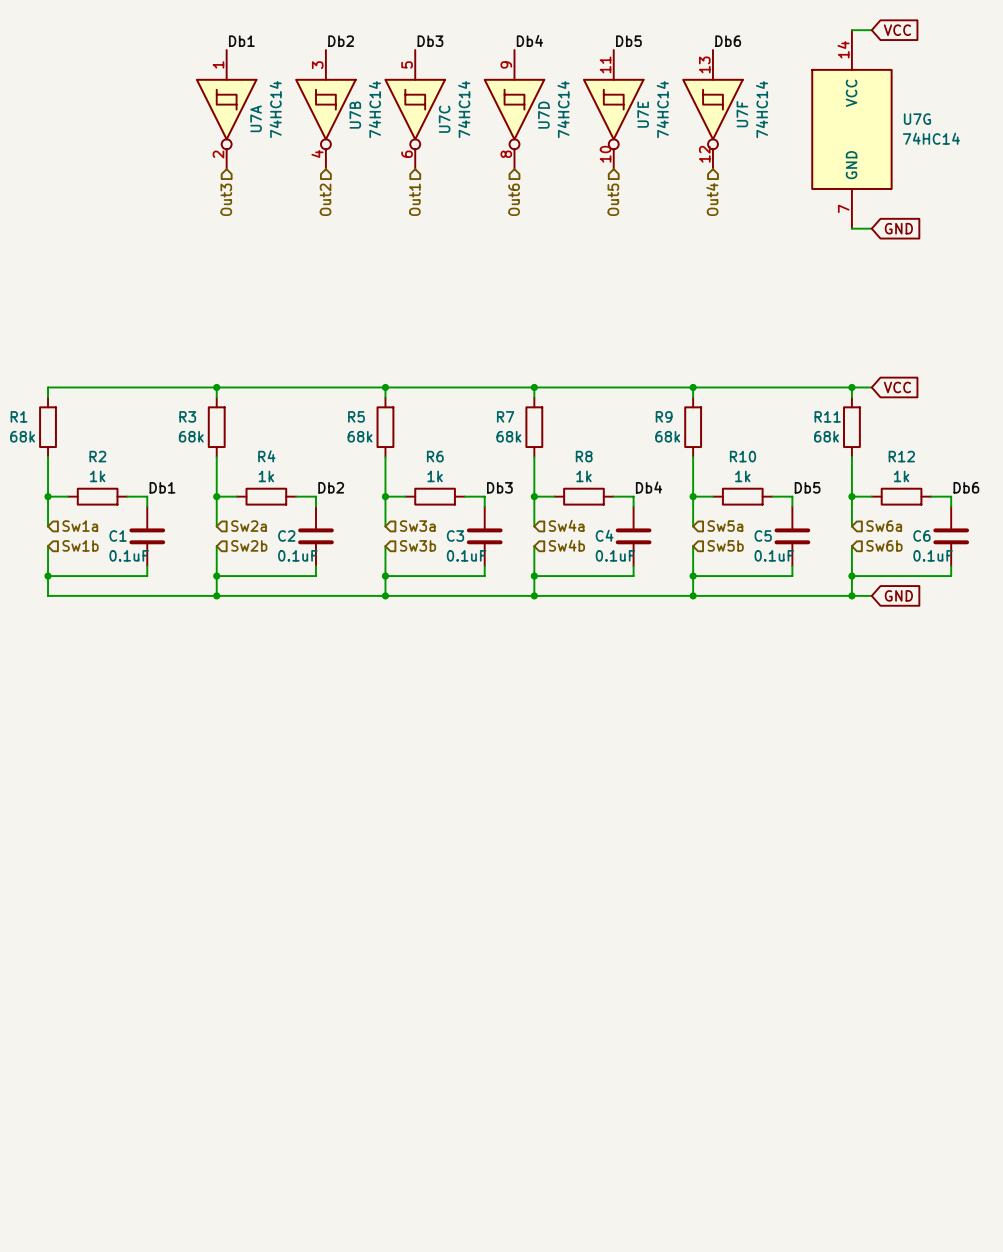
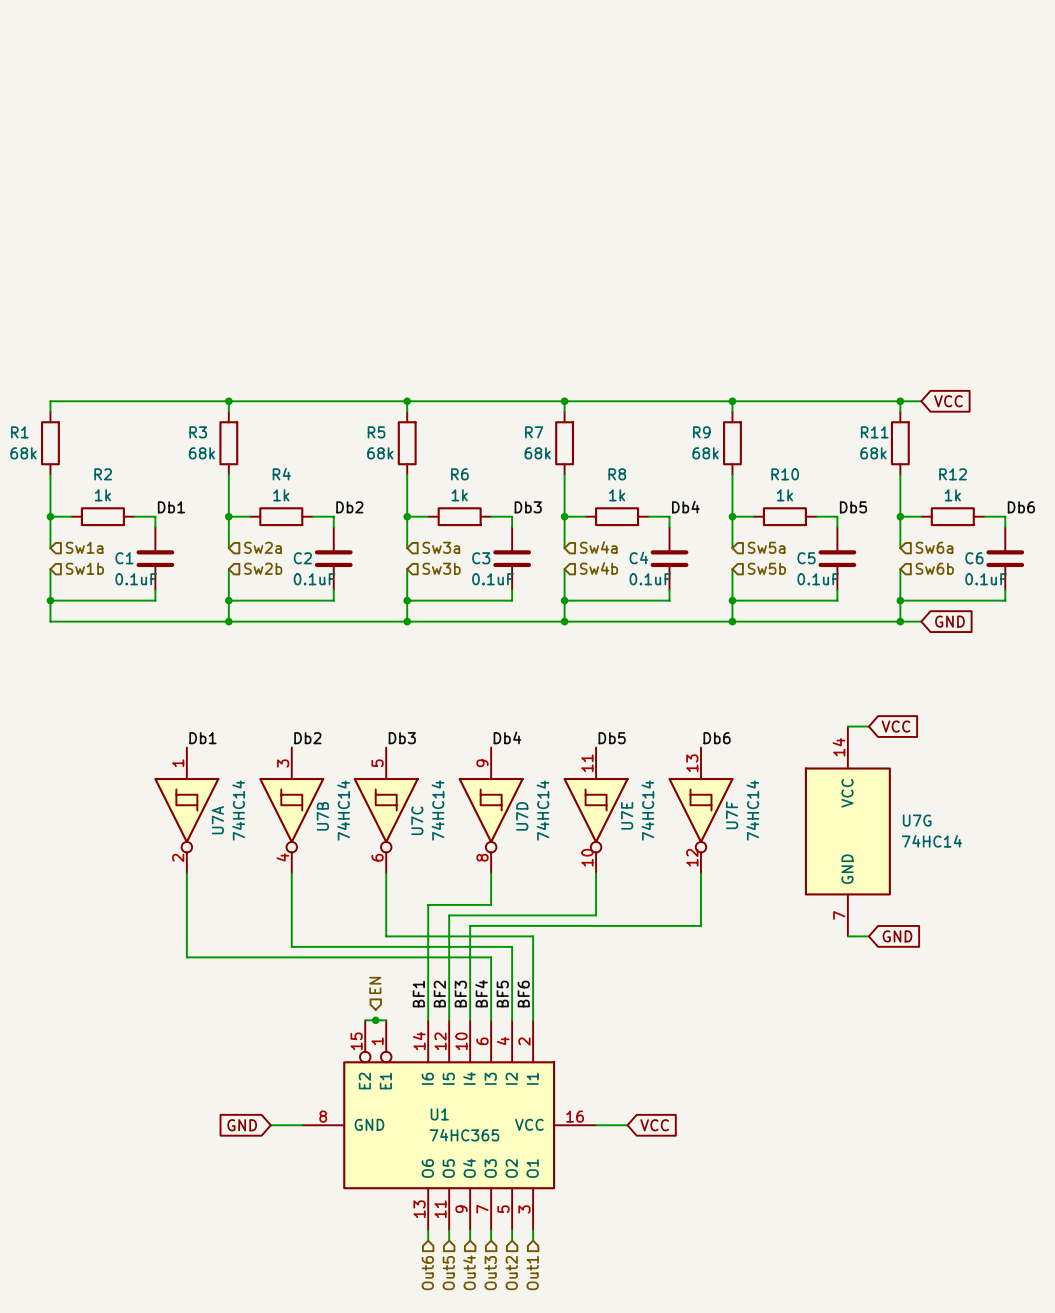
wire: (851, 30) (871, 30) -> none
global label: VCC (897, 30) -> none
label: Db4 (529, 40) -> none
label: Db1 (241, 41) -> none
label: Db2 (341, 41) -> none
label: Db3 (430, 41) -> none
label: Db5 (628, 41) -> none
label: Db6 (728, 41) -> none
U7A position: (226, 109) -> (186, 810)
U7B position: (325, 109) -> (291, 810)
U7C position: (415, 109) -> (386, 810)
U7D position: (514, 109) -> (491, 810)
U7E position: (613, 109) -> (596, 810)
U7F position: (712, 109) -> (700, 810)
U7G position: (851, 129) -> (847, 831)
hierarchical label: Out3 (226, 199) -> none
hierarchical label: Out2 (325, 199) -> none
hierarchical label: Out1 (414, 199) -> none
hierarchical label: Out6 (514, 199) -> none
hierarchical label: Out5 (613, 199) -> none
hierarchical label: Out4 (712, 199) -> none
wire: (851, 228) (871, 228) -> none
global label: GND (898, 228) -> none
wire: none -> (847, 726) (868, 726)
global label: none -> VCC (896, 726)
label: none -> Db4 (507, 737)
label: none -> Db1 (202, 738)
label: none -> Db2 (307, 738)
label: none -> Db3 (402, 738)
label: none -> Db5 (612, 738)
label: none -> Db6 (717, 738)
wire: none -> (186, 873) (186, 957) (491, 957) (491, 1020)
wire: none -> (291, 873) (291, 946) (512, 946) (512, 1020)
wire: none -> (386, 873) (386, 936) (533, 936) (533, 1020)
wire: none -> (491, 873) (491, 904) (428, 904) (428, 1020)
wire: none -> (596, 873) (596, 915) (449, 915) (449, 1020)
wire: none -> (700, 873) (700, 925) (470, 925) (470, 1020)
wire: none -> (847, 936) (868, 936)
global label: none -> GND (897, 936)
hierarchical label: none -> EN (375, 985)
label: none -> BF4 (481, 993)
label: none -> BF1 (418, 994)
label: none -> BF2 (439, 994)
label: none -> BF3 (460, 994)
label: none -> BF5 (502, 994)
label: none -> BF6 (523, 994)
wire: none -> (365, 1020) (386, 1020)
junction: none -> (375, 1020)
global label: none -> GND (242, 1125)
wire: none -> (270, 1125) (302, 1125)
U1: none -> 74HC365 (449, 1125)
wire: none -> (596, 1125) (627, 1125)
global label: none -> VCC (654, 1125)
wire: none -> (428, 1230) (428, 1240)
wire: none -> (449, 1230) (449, 1240)
wire: none -> (470, 1230) (470, 1240)
wire: none -> (491, 1230) (491, 1240)
wire: none -> (512, 1230) (512, 1240)
wire: none -> (533, 1230) (533, 1240)
hierarchical label: none -> Out4 (469, 1272)
hierarchical label: none -> Out6 (427, 1273)
hierarchical label: none -> Out5 (448, 1273)
hierarchical label: none -> Out3 (490, 1273)
hierarchical label: none -> Out2 (511, 1273)
hierarchical label: none -> Out1 (532, 1273)

